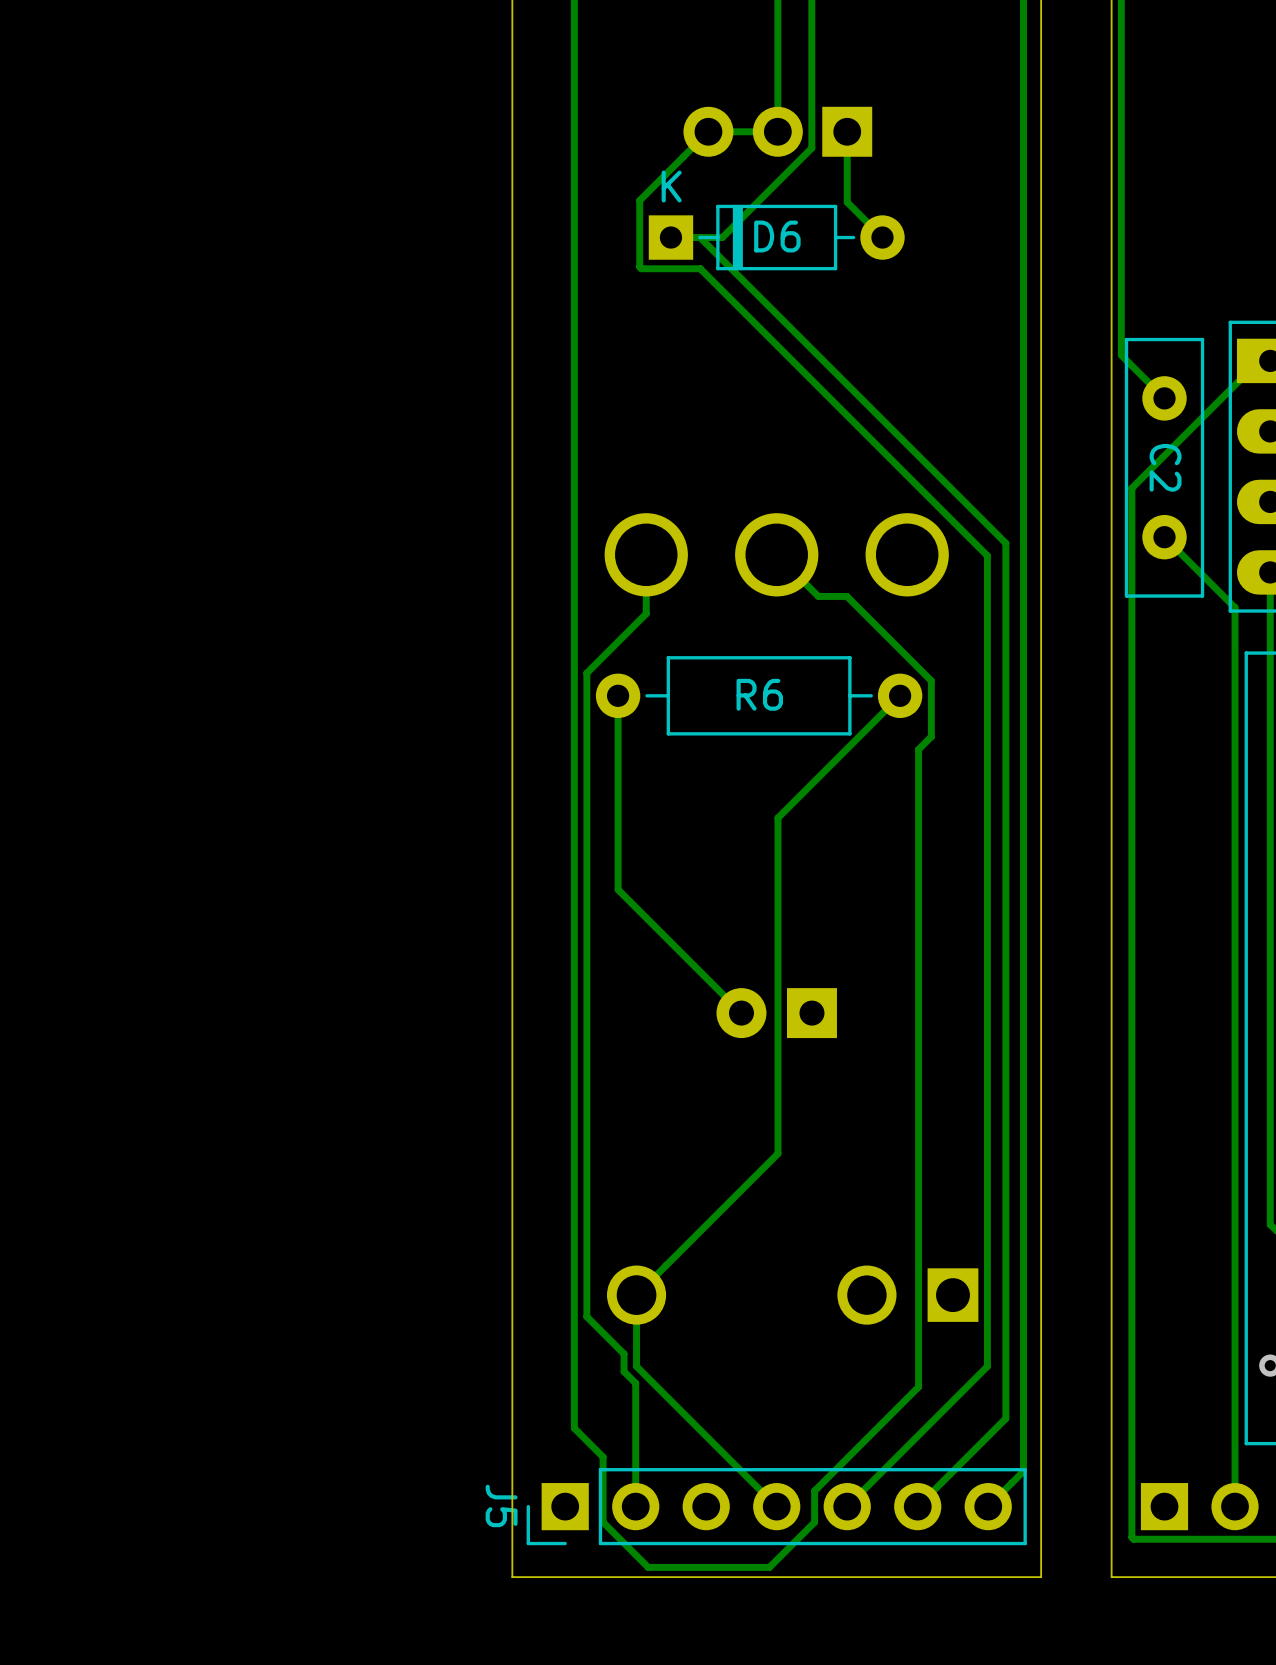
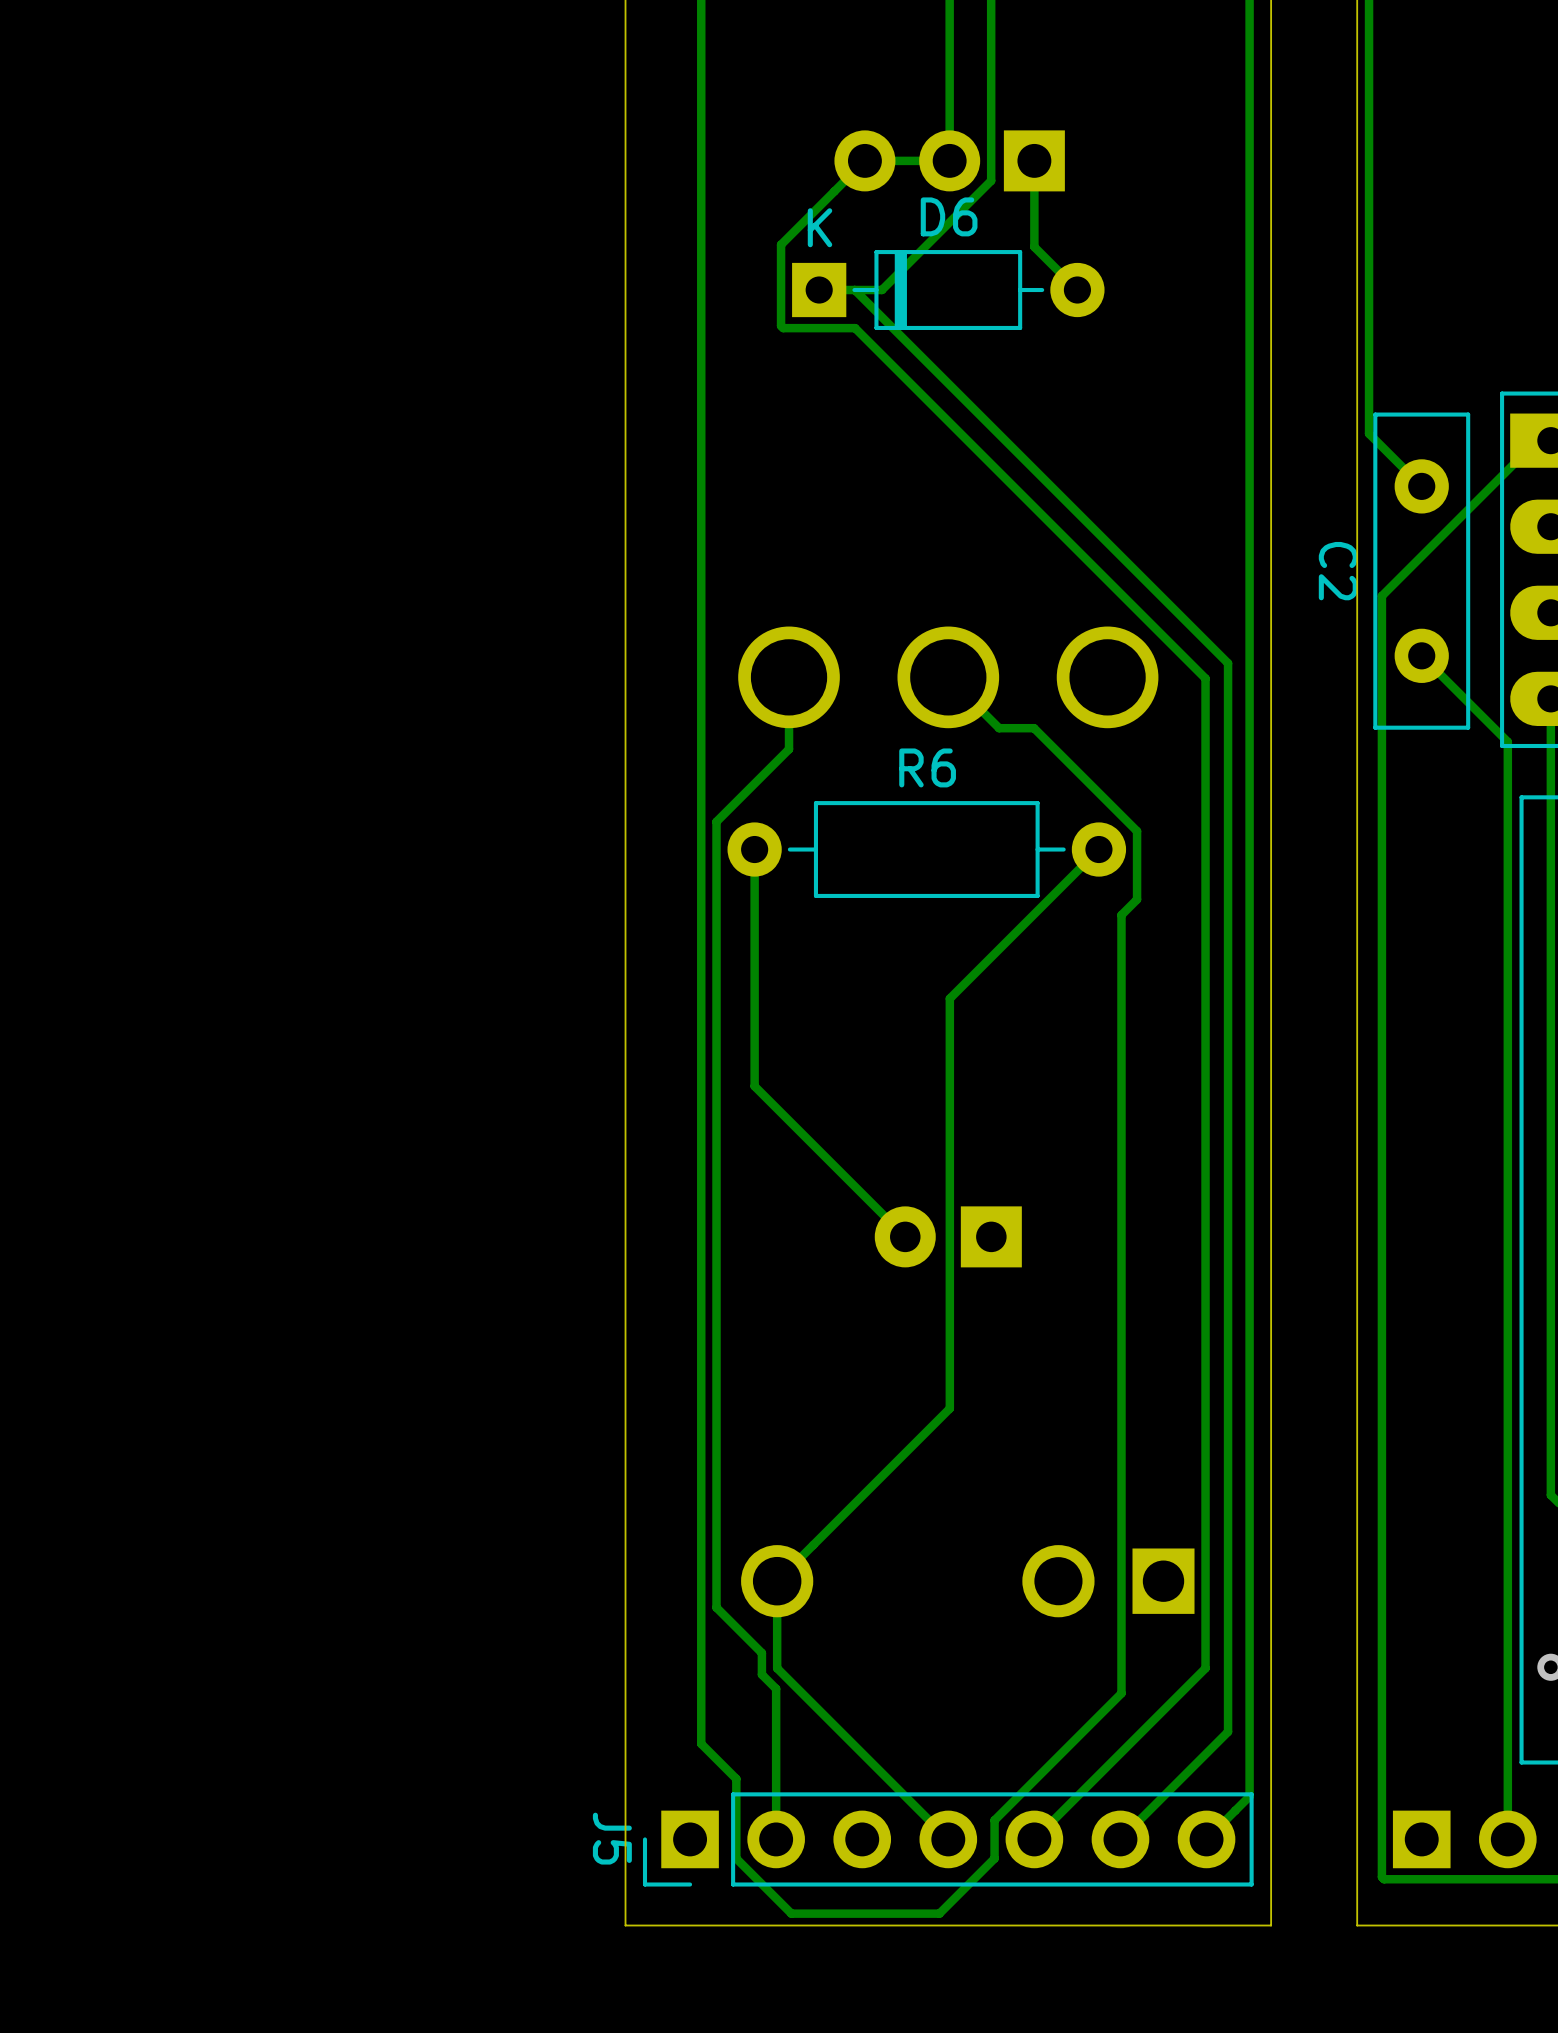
D6 name position: D6 (777, 236) -> D6 (949, 216)
C2 name position: C2 (1165, 467) -> C2 (1338, 571)
R6 name position: R6 (759, 694) -> R6 (927, 767)

